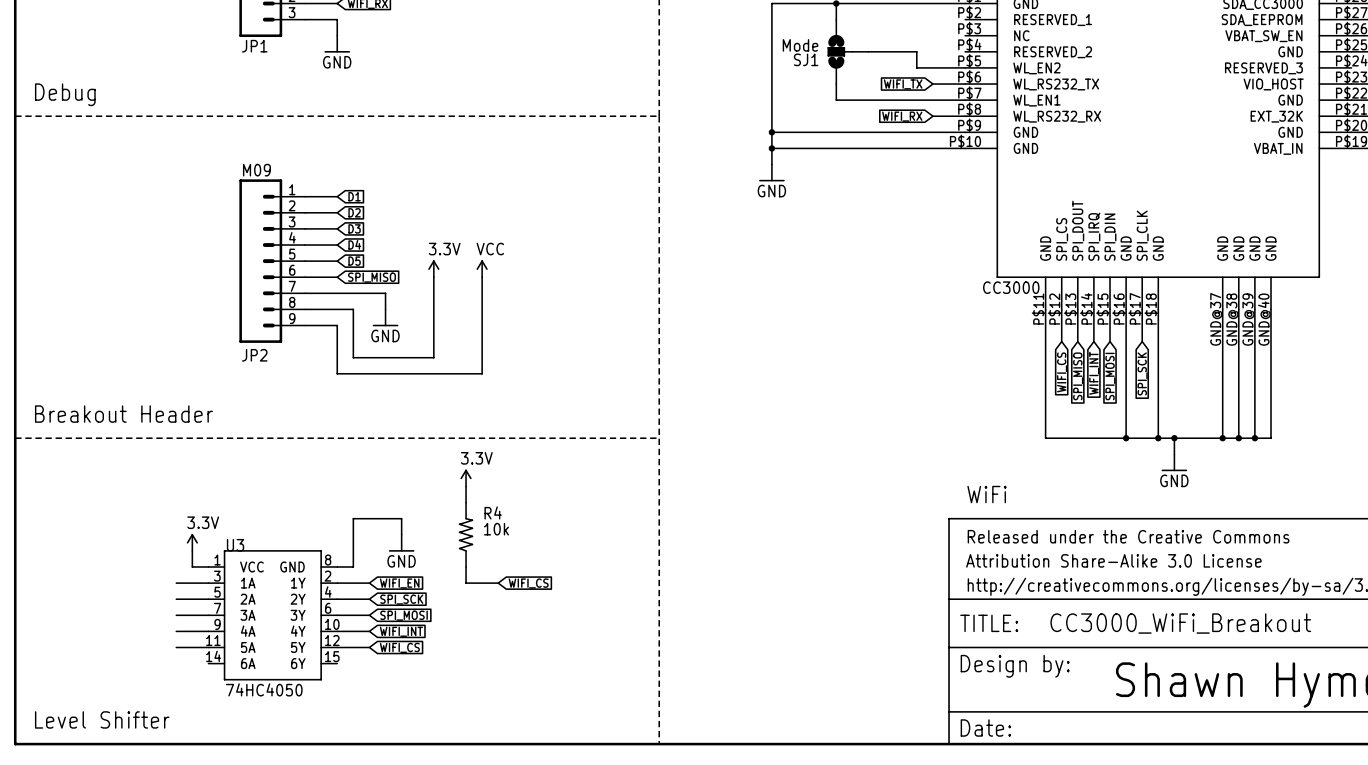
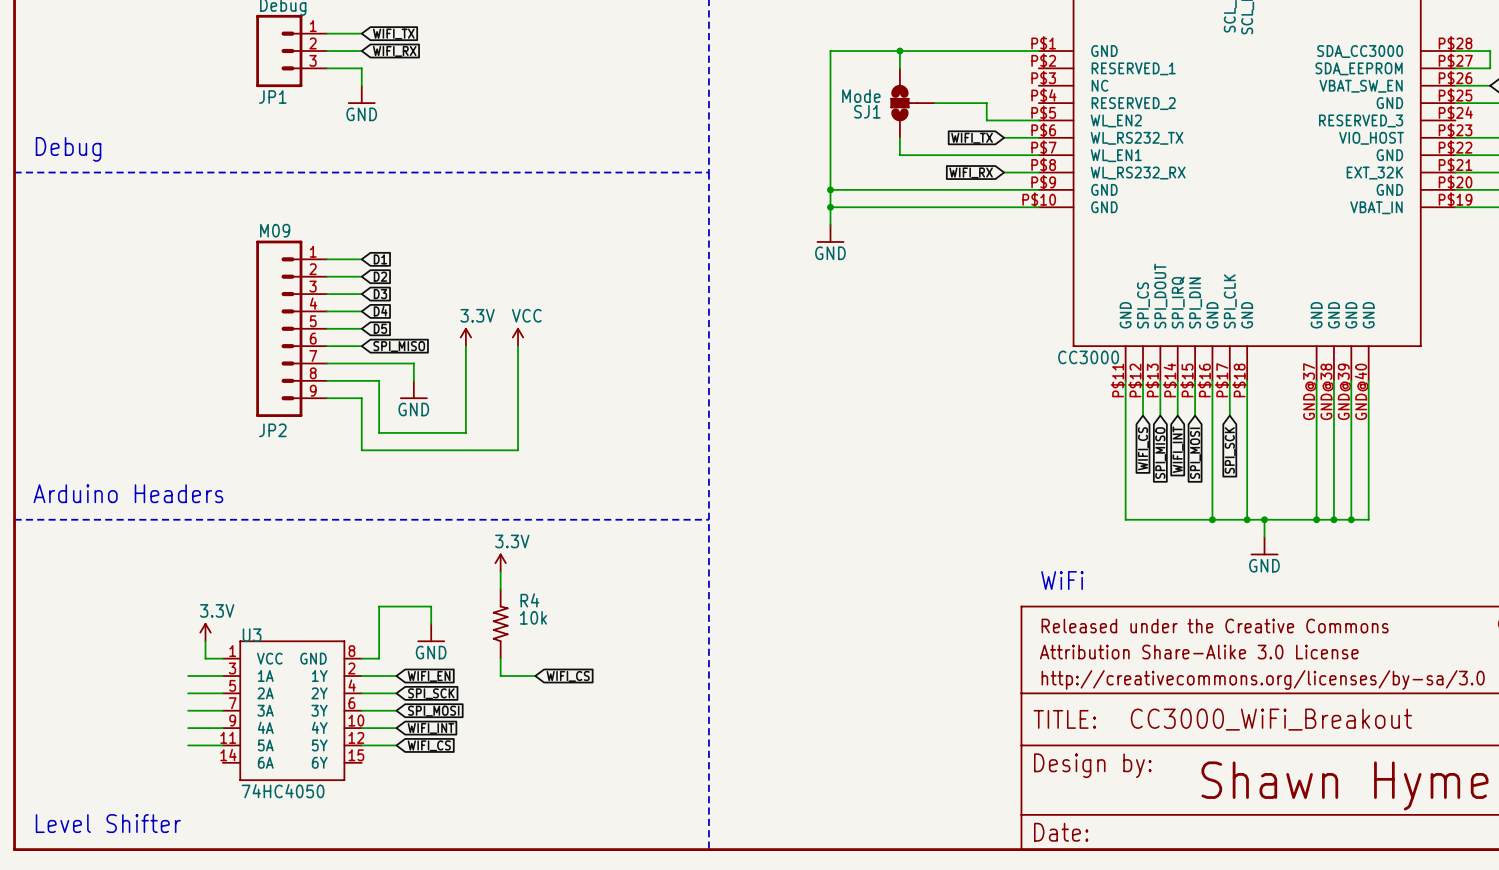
text: Breakout Header (123, 414) -> Arduino Headers (128, 493)

